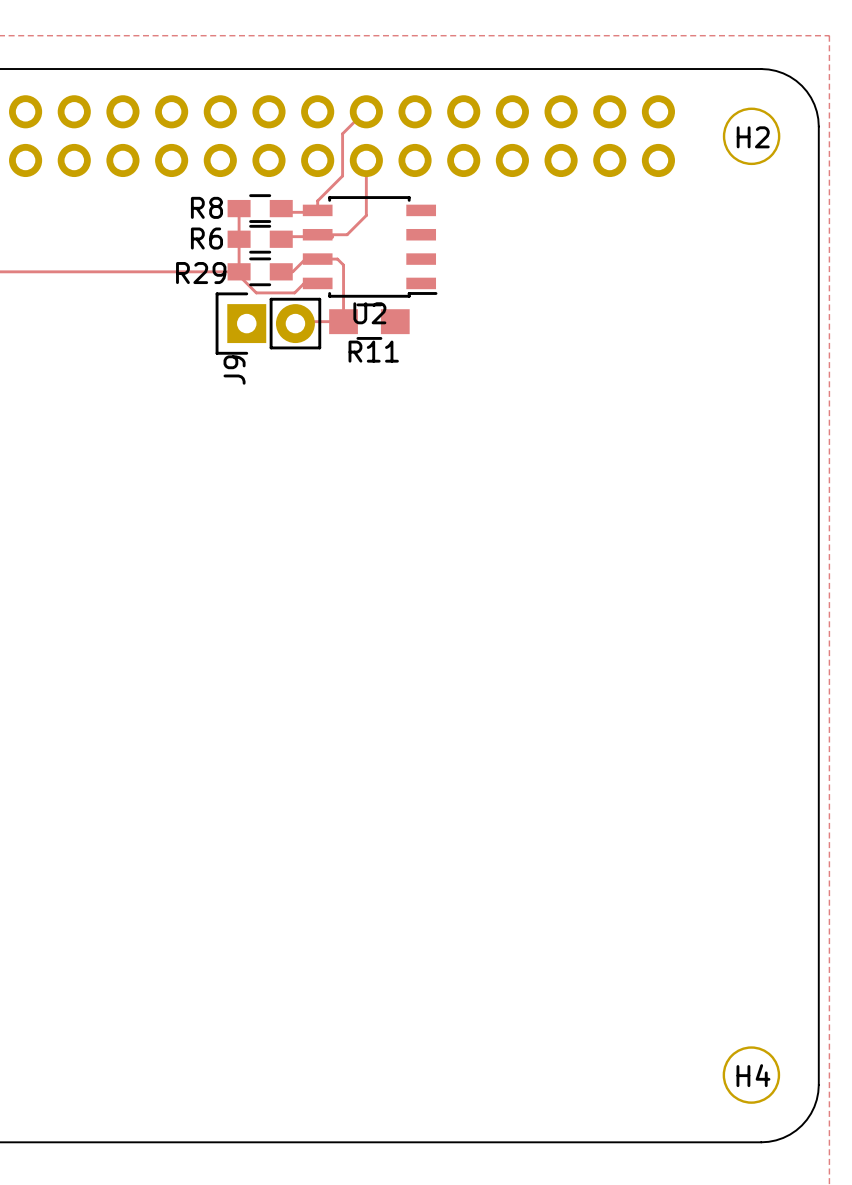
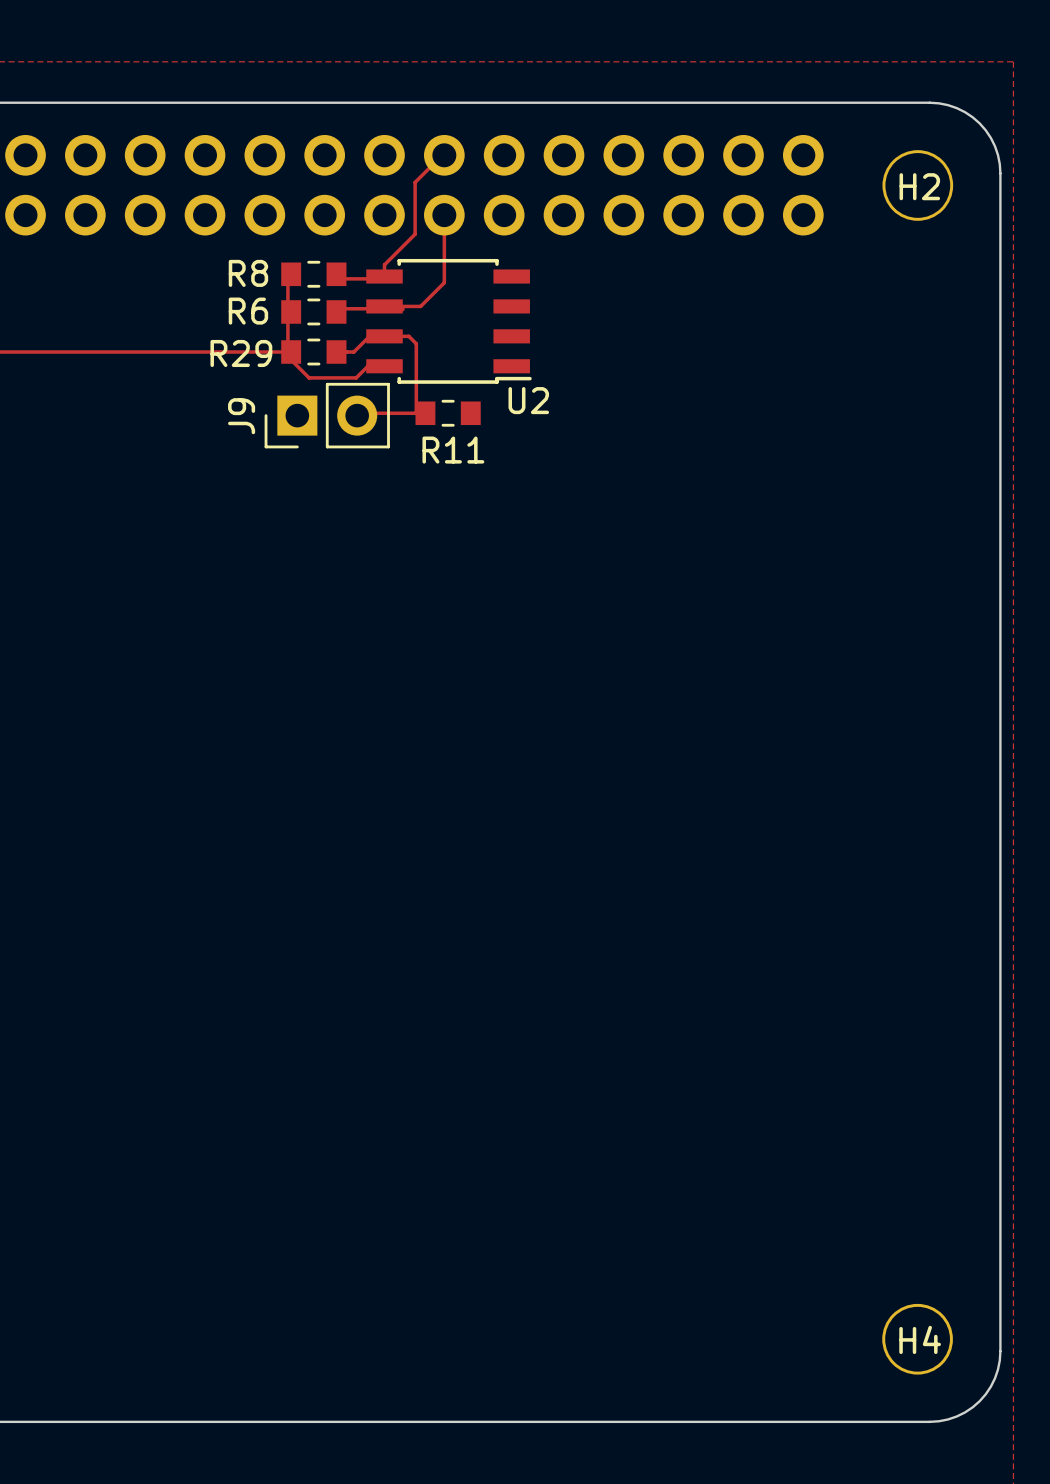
R8 footprint: [227, 194, 293, 223] -> [281, 260, 347, 288]
R6 footprint: [227, 224, 293, 254] -> [281, 298, 347, 326]
R29 footprint: [227, 257, 293, 287] -> [281, 338, 347, 366]
J9 footprint: [215, 292, 322, 355] -> [264, 382, 390, 449]
R11 footprint: [329, 303, 410, 340] -> [415, 399, 481, 427]
U2 name position: U2 (369, 313) -> U2 (528, 400)
J9 name position: J9 (234, 370) -> J9 (241, 416)

